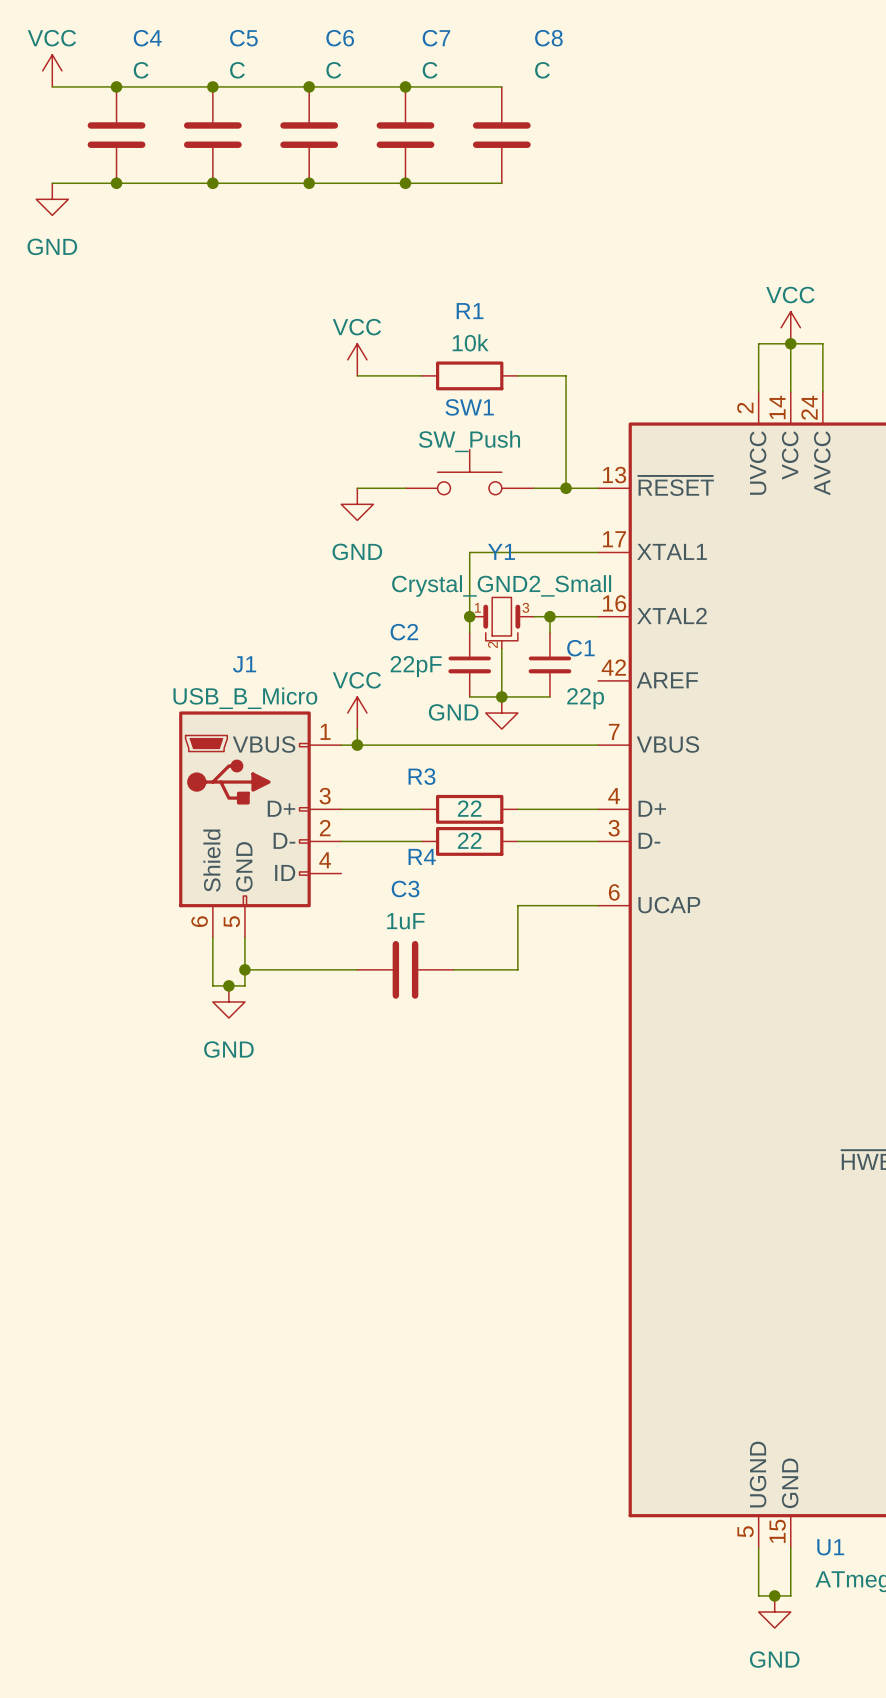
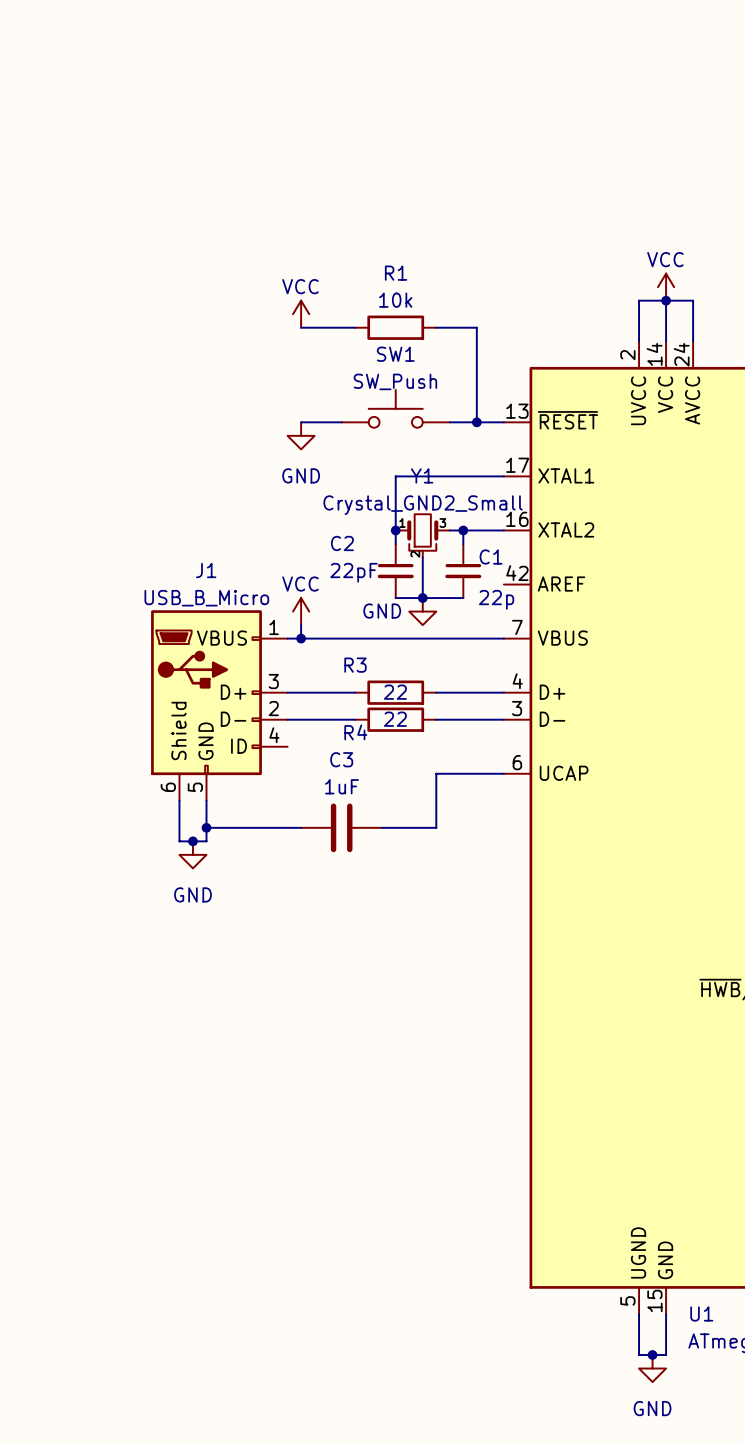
power symbol: VCC (52, 70) -> none
wire: (52, 86) (501, 86) -> none
junction: (116, 86) -> none
junction: (212, 86) -> none
junction: (309, 86) -> none
junction: (405, 86) -> none
C4: C (116, 135) -> none
C5: C (212, 135) -> none
C6: C (309, 135) -> none
C7: C (405, 135) -> none
C8: C (501, 135) -> none
wire: (52, 183) (501, 183) -> none
junction: (116, 183) -> none
junction: (212, 183) -> none
junction: (309, 183) -> none
junction: (405, 183) -> none
power symbol: GND (52, 199) -> none

